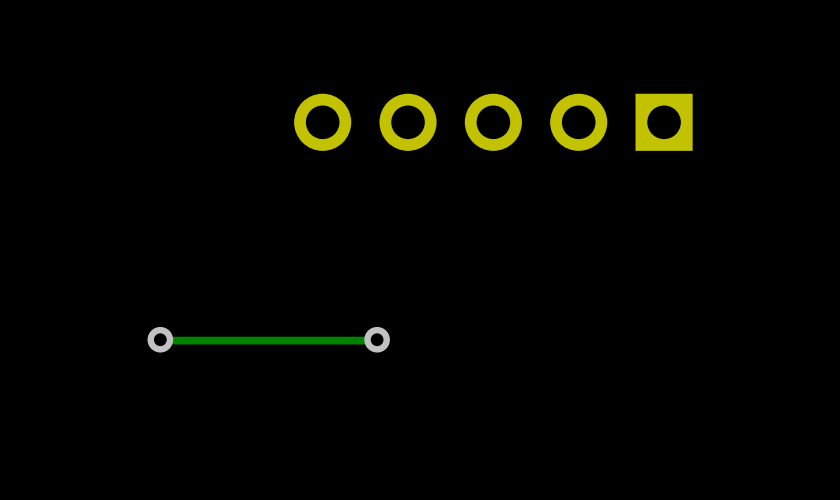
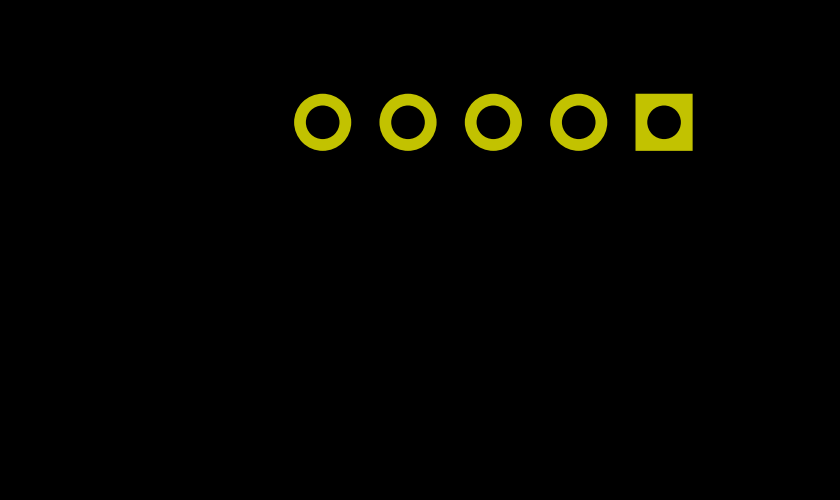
via: (160, 339) -> none
track: (377, 339) (160, 339) -> none
via: (377, 339) -> none

